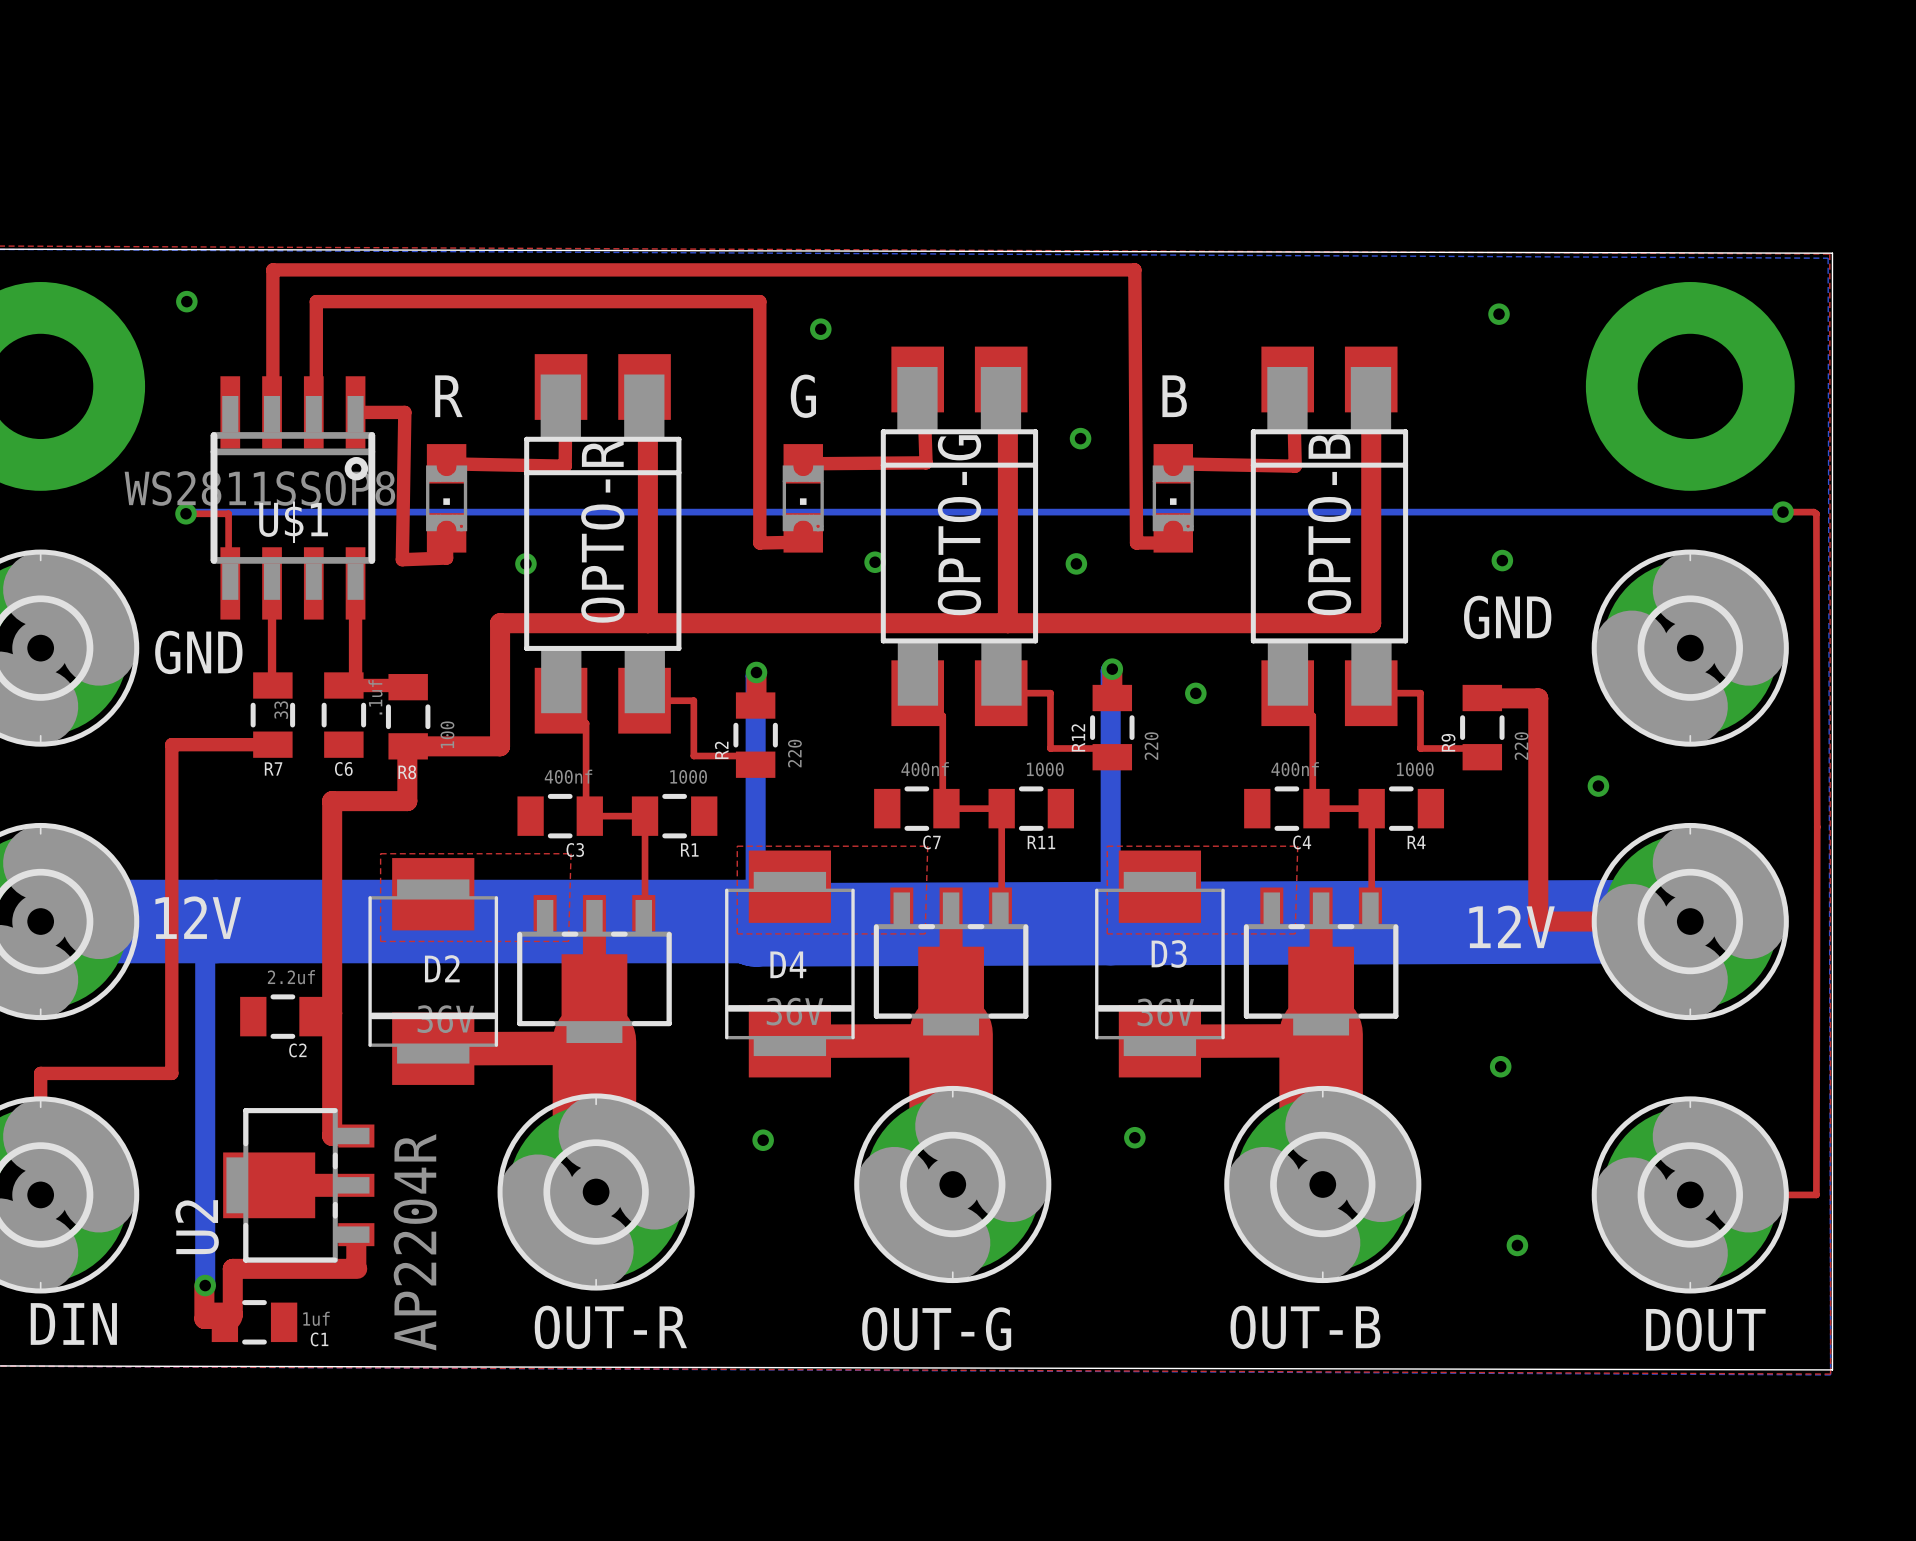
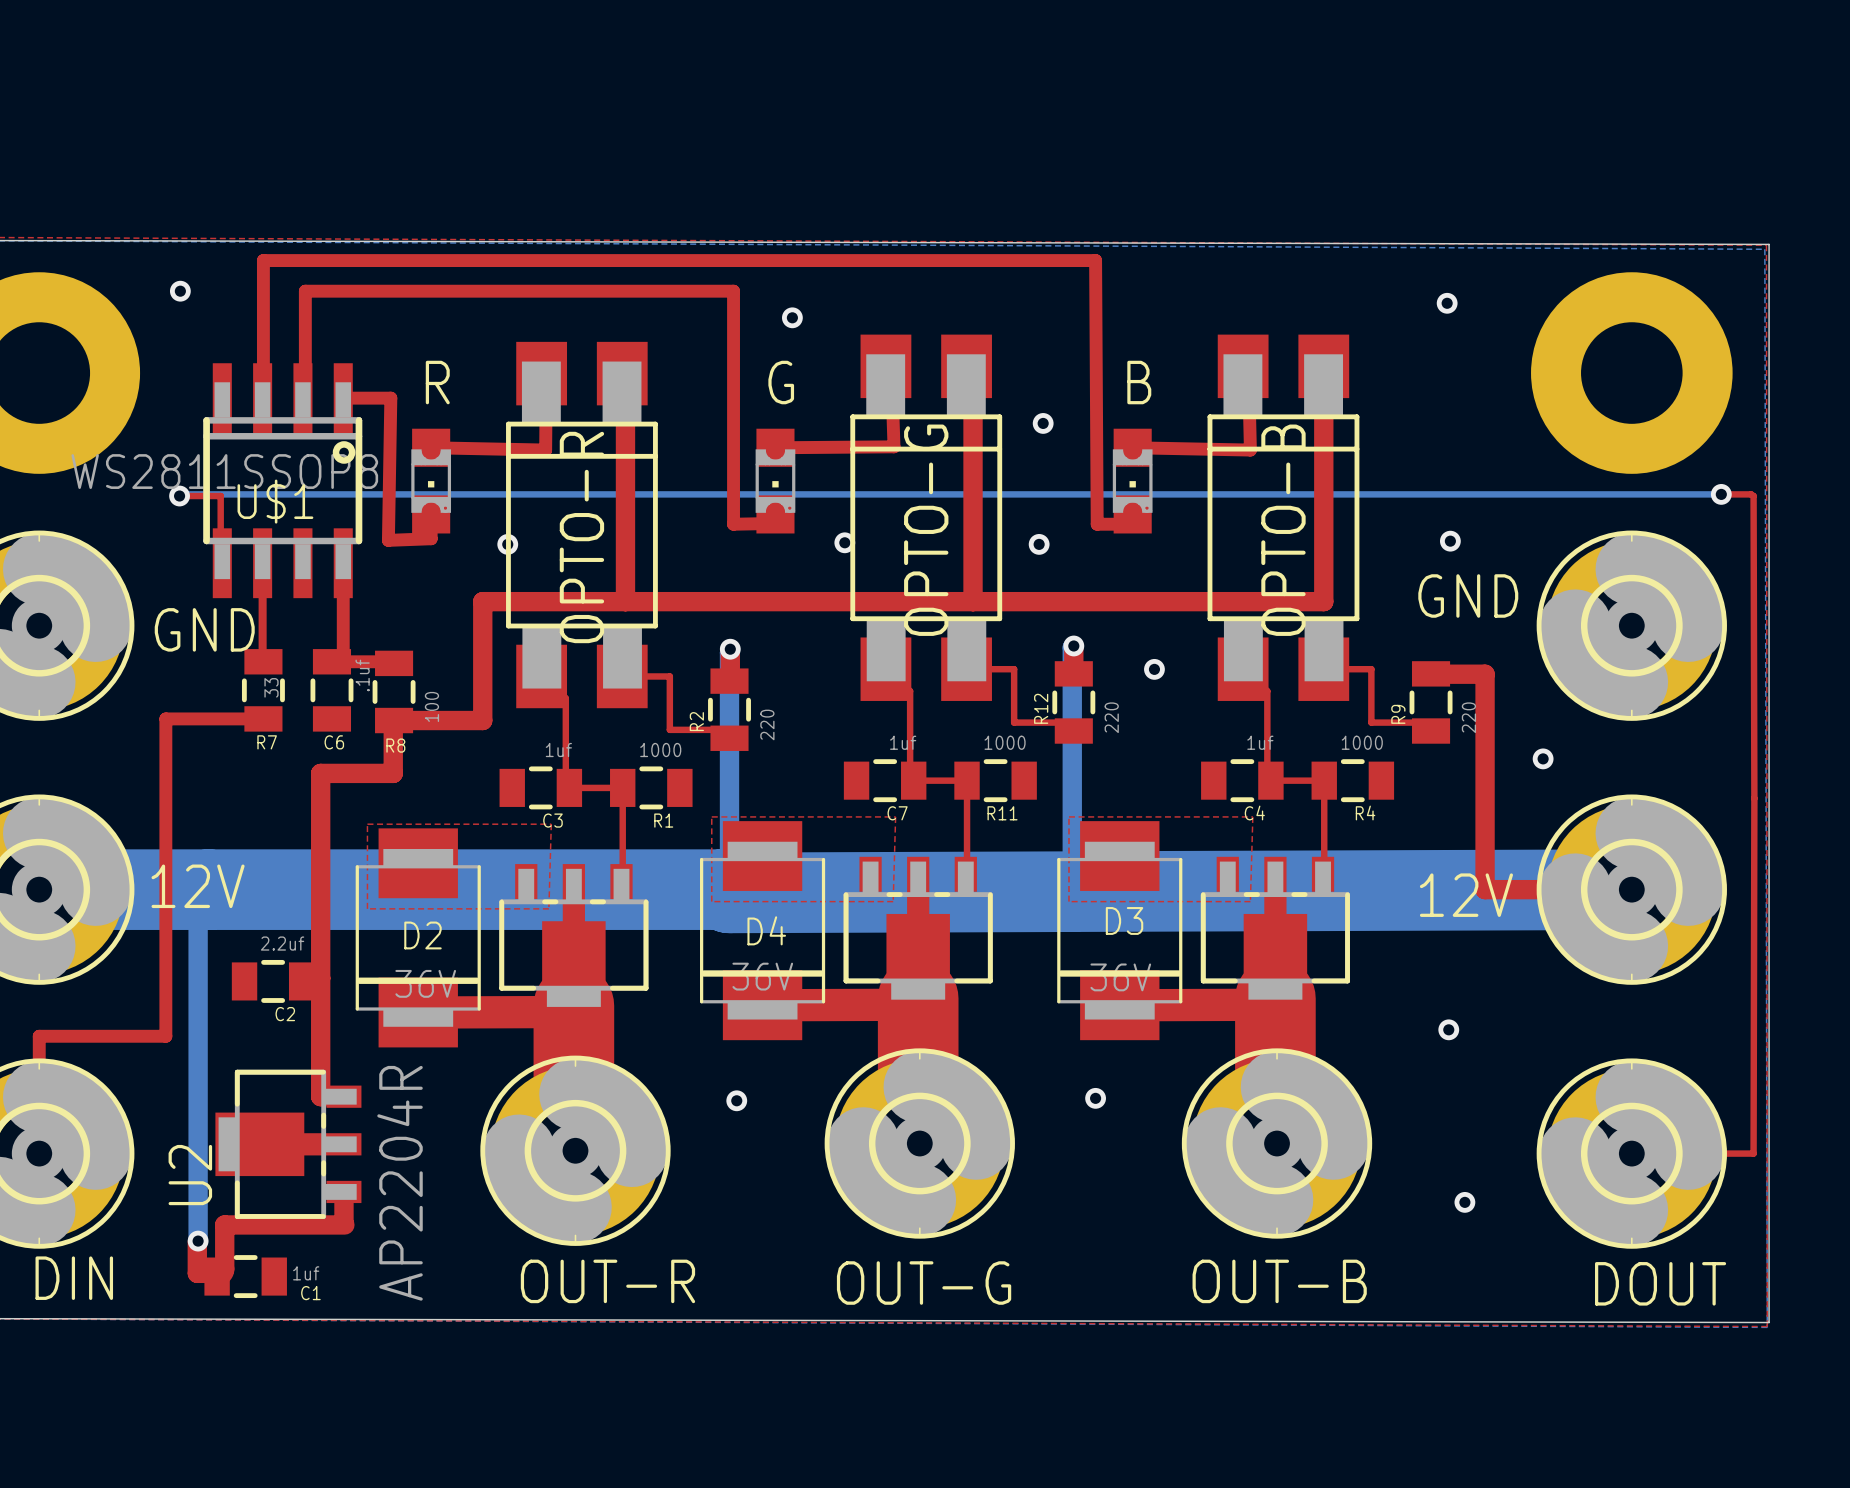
C7 value: 400nf (925, 769) -> 1uf (903, 742)
C4 value: 400nf (1295, 769) -> 1uf (1260, 742)
C3 value: 400nf (568, 776) -> 1uf (558, 750)

